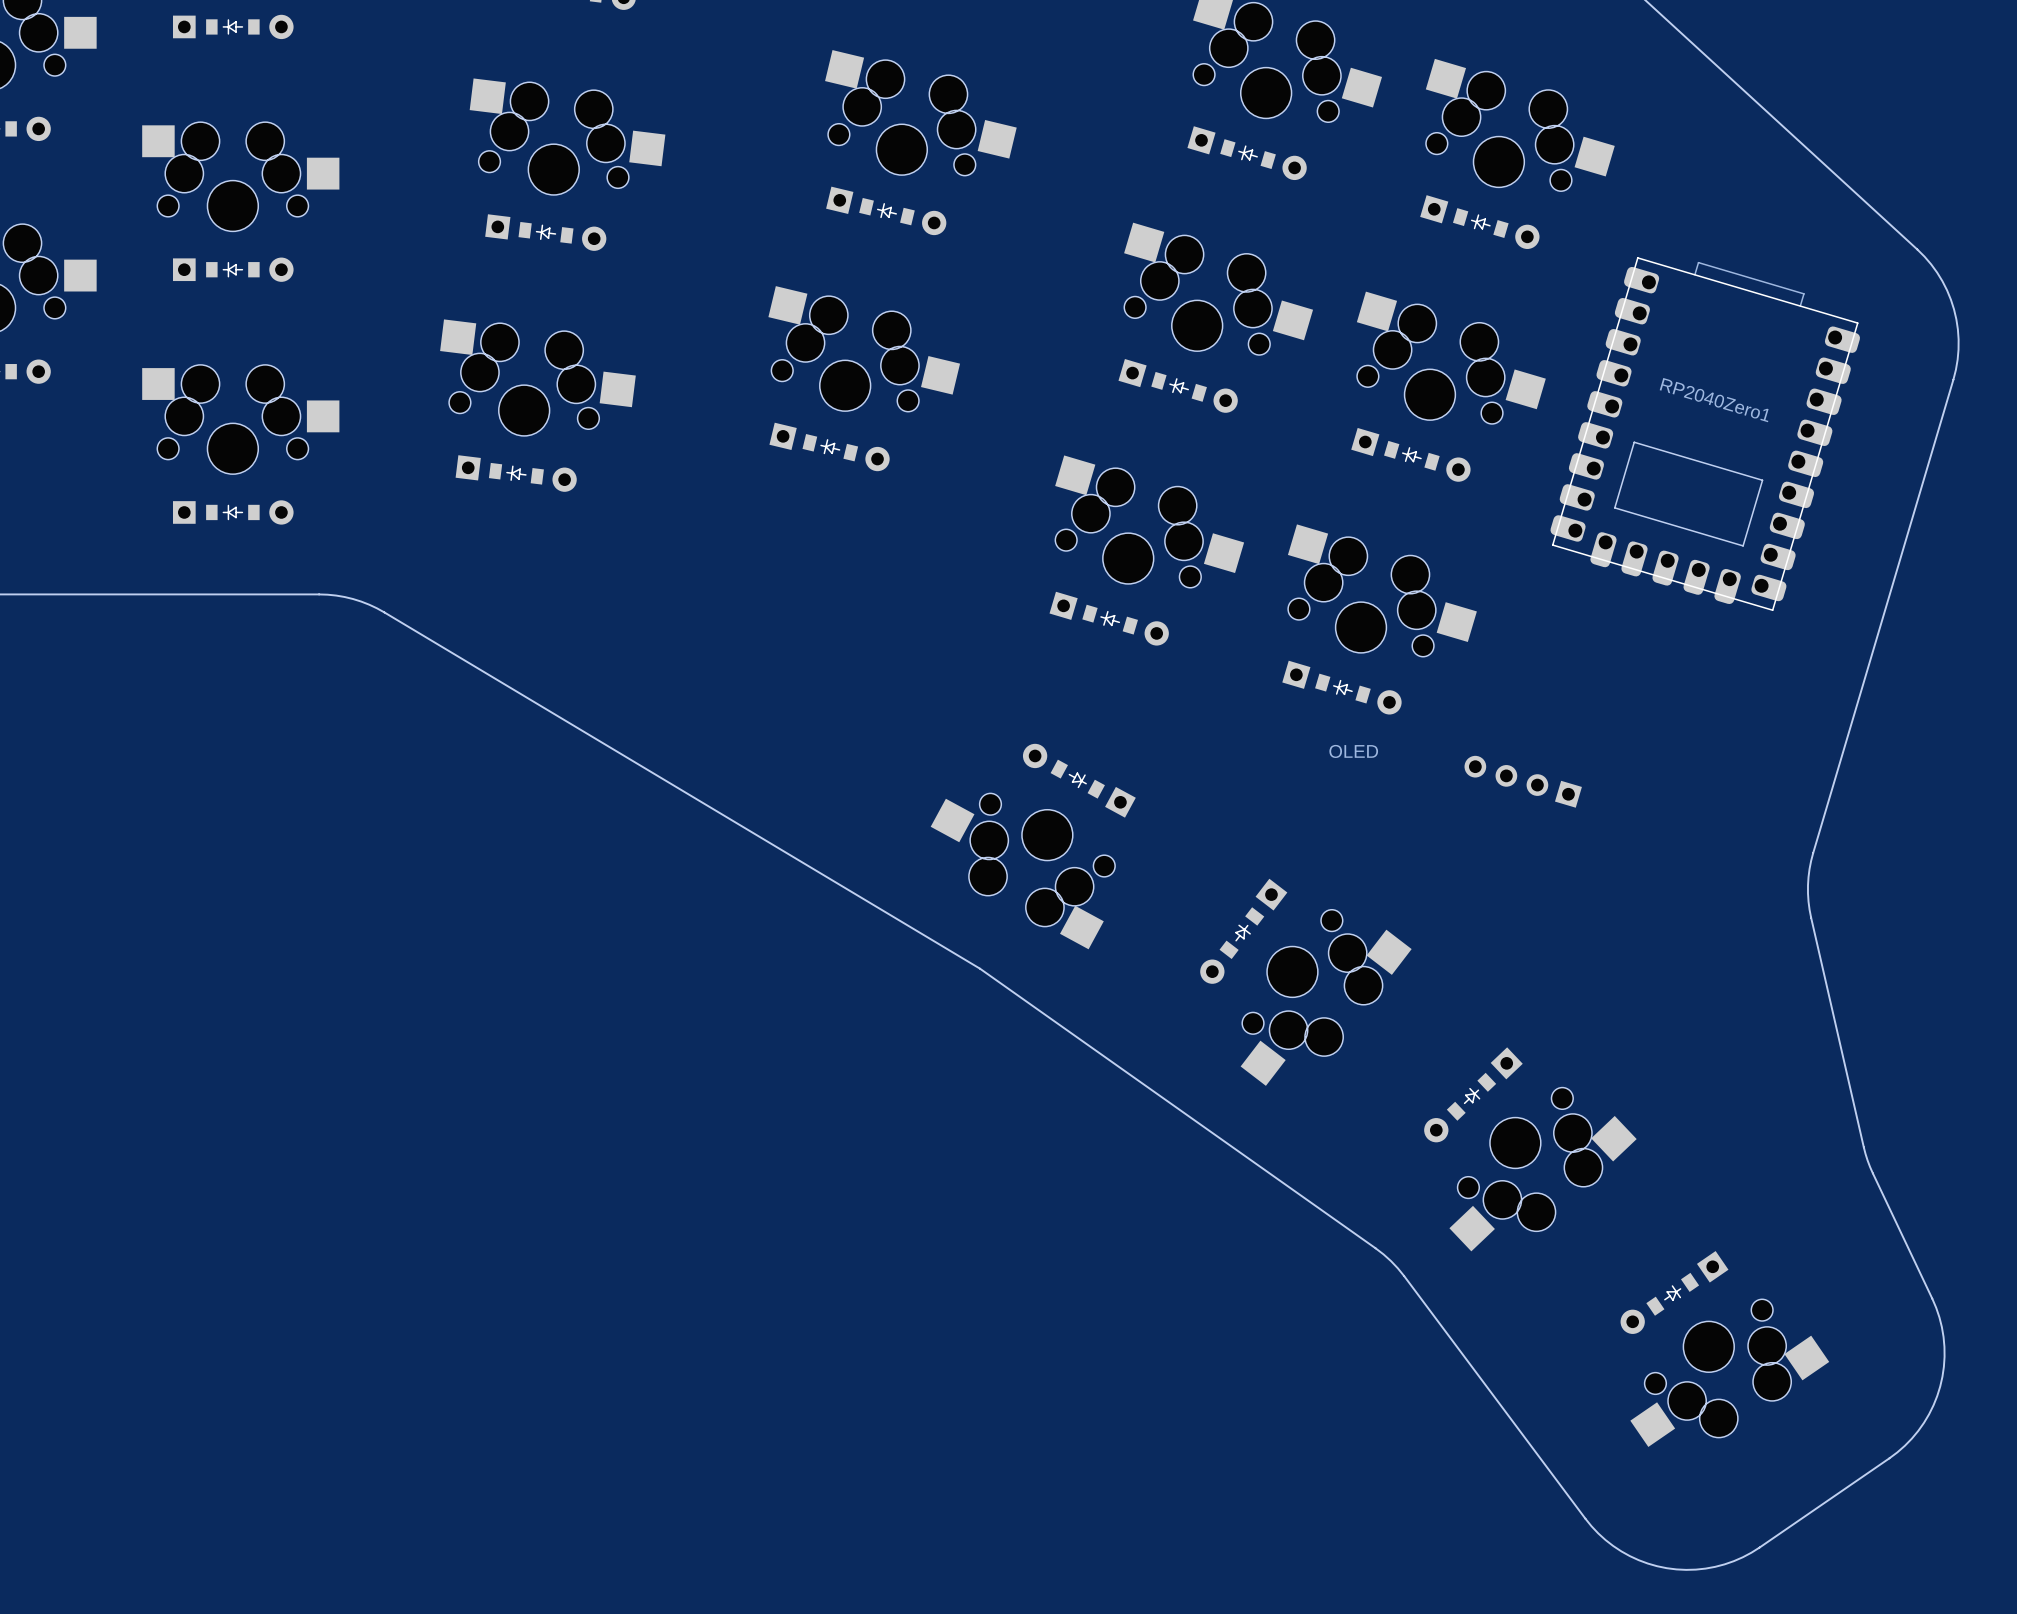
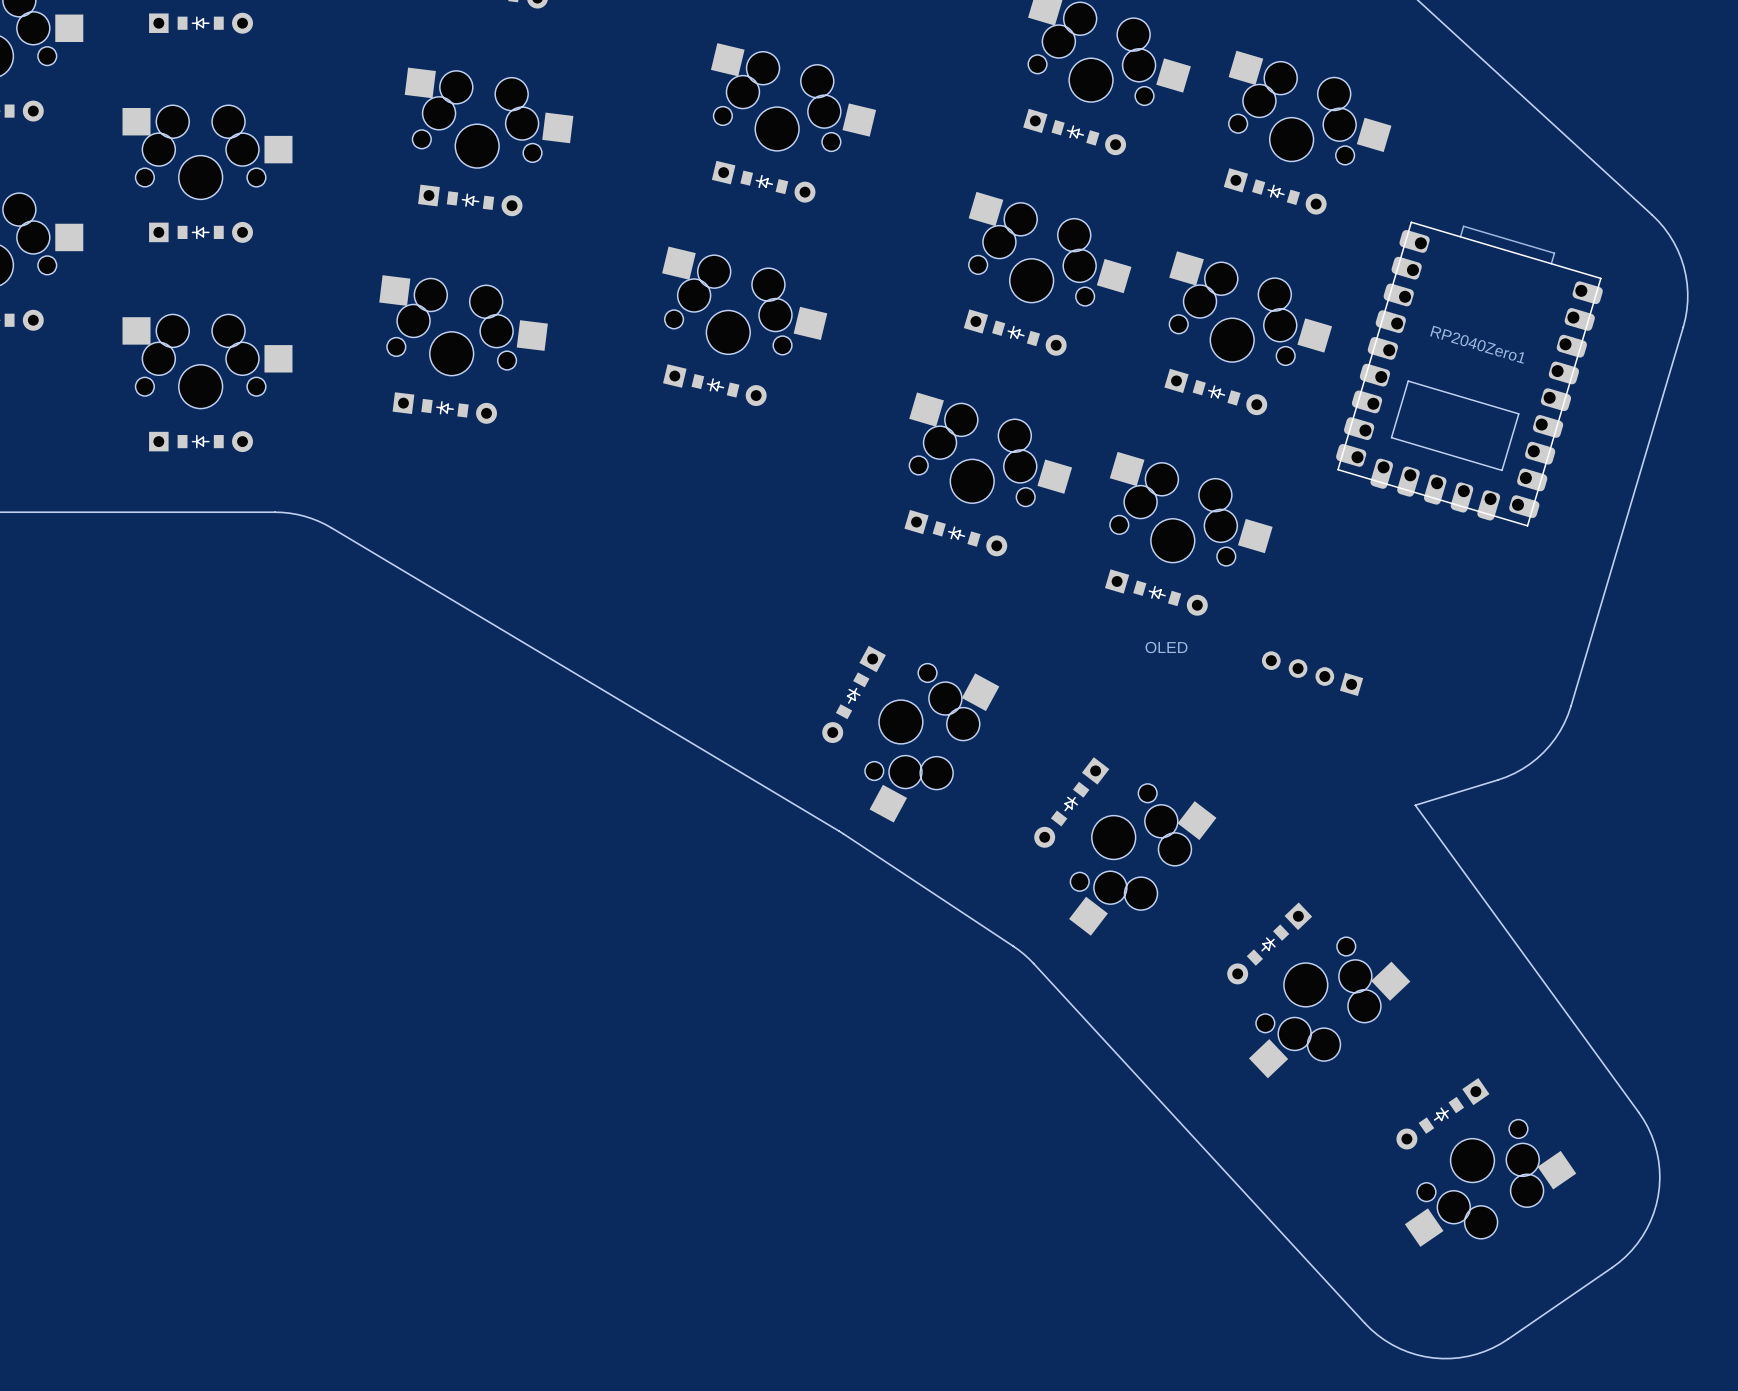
board edge: (384, 612) (980, 968) (1375, 1248) (1391, 1261) (1404, 1276) (1585, 1518) (1613, 1545) (1647, 1563) (1686, 1569) (1724, 1564) (1759, 1547) -> (331, 527) (841, 832) (1018, 950) (1033, 963) (1364, 1323) (1384, 1340) (1416, 1354) (1450, 1358) (1484, 1351) (1516, 1333)
part rotation: 0° (1079, 780) -> 90° counterclockwise (854, 694)
part position: (1079, 780) -> (854, 694)
board edge: (1823, 819) (1809, 869) (1808, 901) (1863, 1147) (1872, 1173) (1936, 1307) (1941, 1327) (1944, 1346) (1943, 1366) (1940, 1386) (1929, 1414) (1918, 1430) (1904, 1445) (1870, 1471) -> (1571, 706) (1564, 723) (1549, 745) (1522, 769) (1497, 780) (1415, 805) (1638, 1112) (1651, 1135) (1659, 1169) (1656, 1204) (1650, 1220) (1637, 1243) (1612, 1267)
part rotation: 0° (1022, 871) -> 90° counterclockwise (932, 743)

